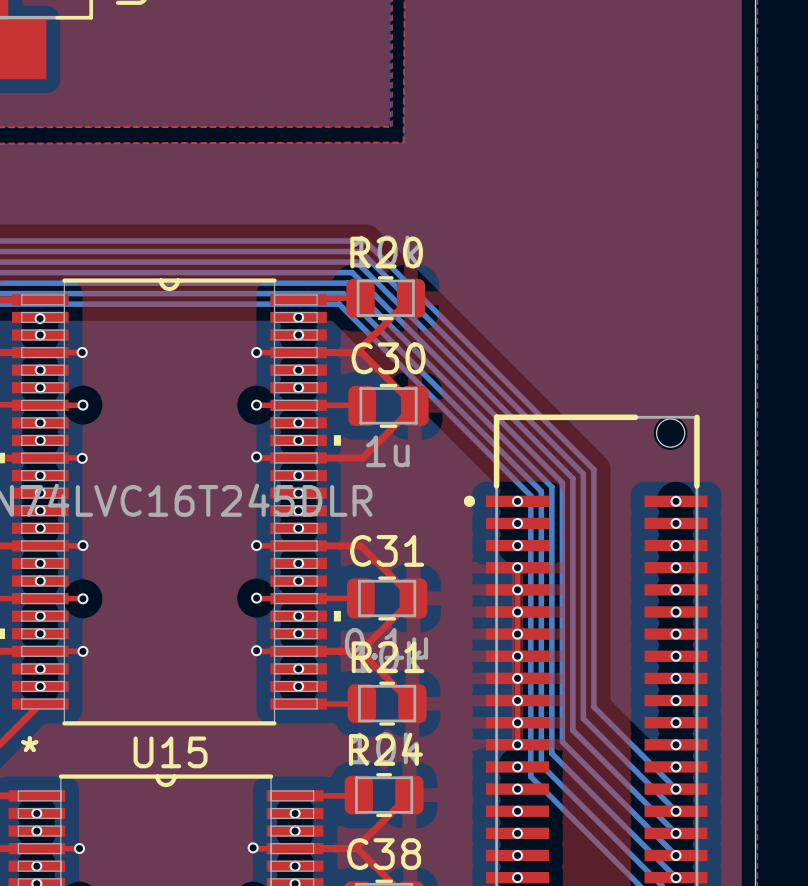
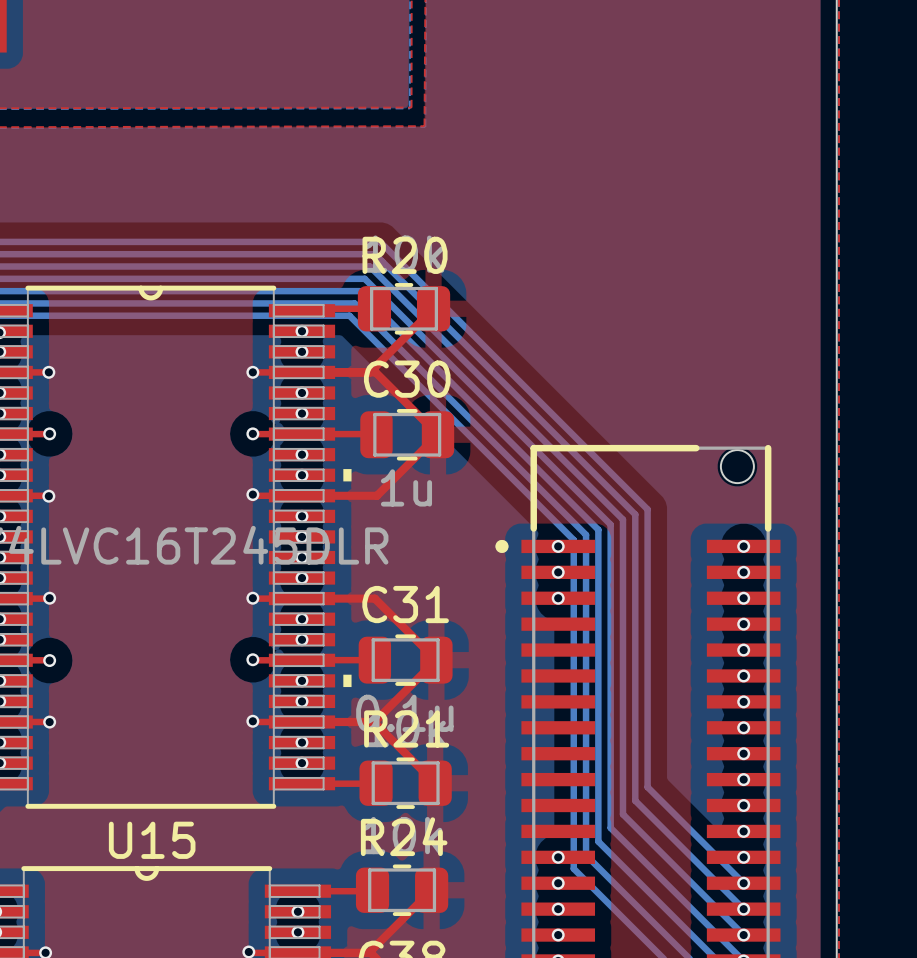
top track: (517, 567) (517, 744) -> none
via: (517, 567) -> none
via: (517, 589) -> none
via: (517, 611) -> none
via: (517, 634) -> none
via: (517, 656) -> none
via: (517, 678) -> none
via: (517, 700) -> none
via: (517, 722) -> none
via: (517, 744) -> none

